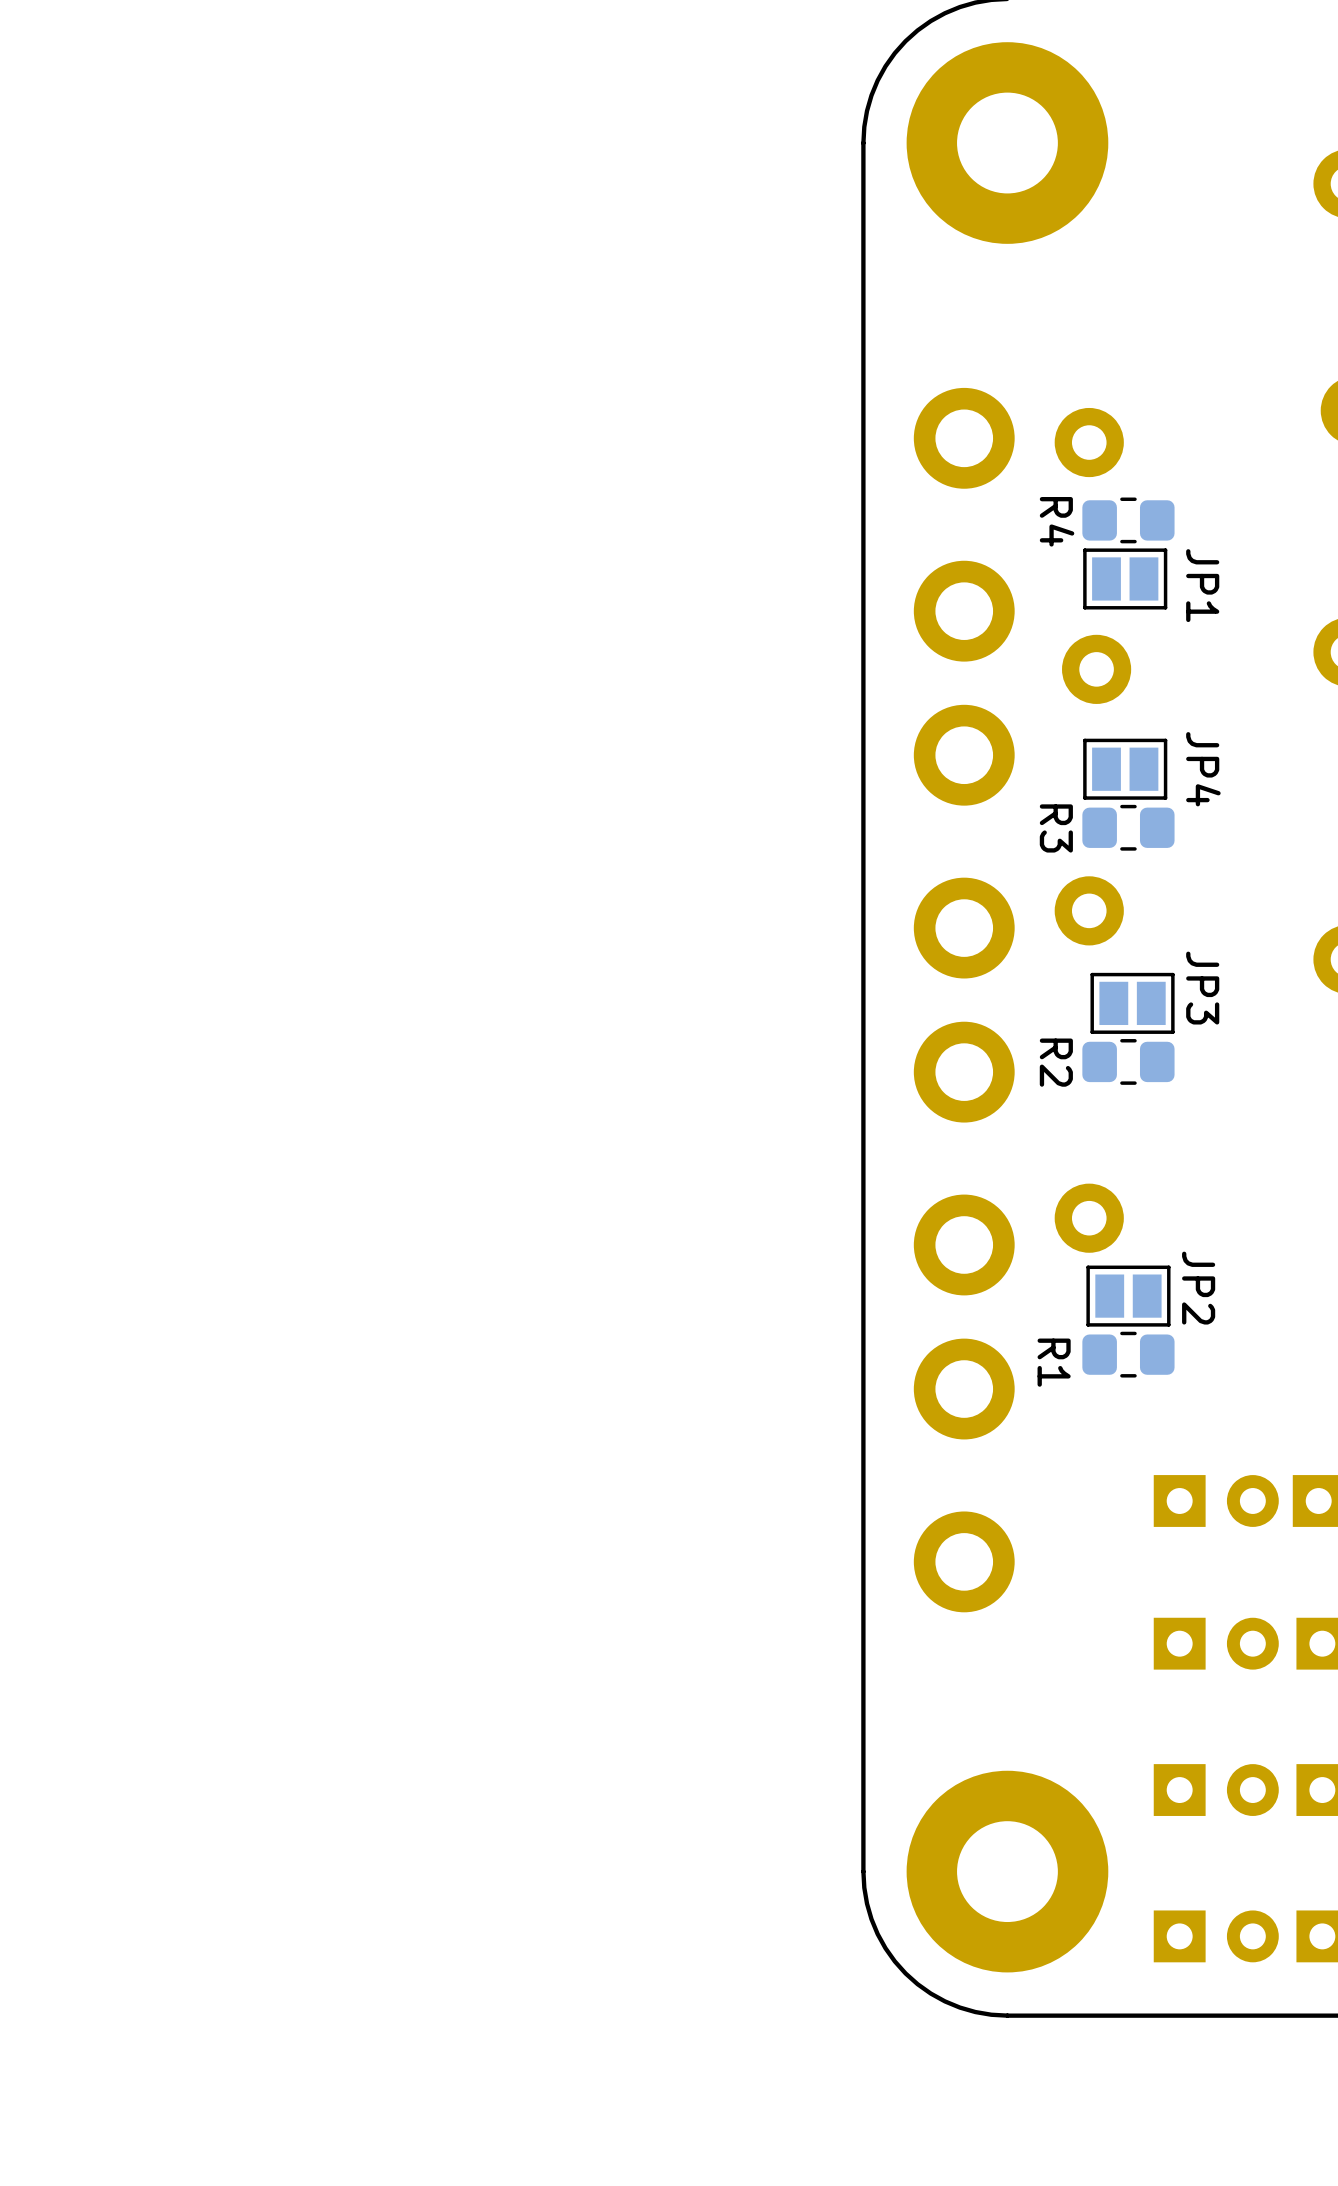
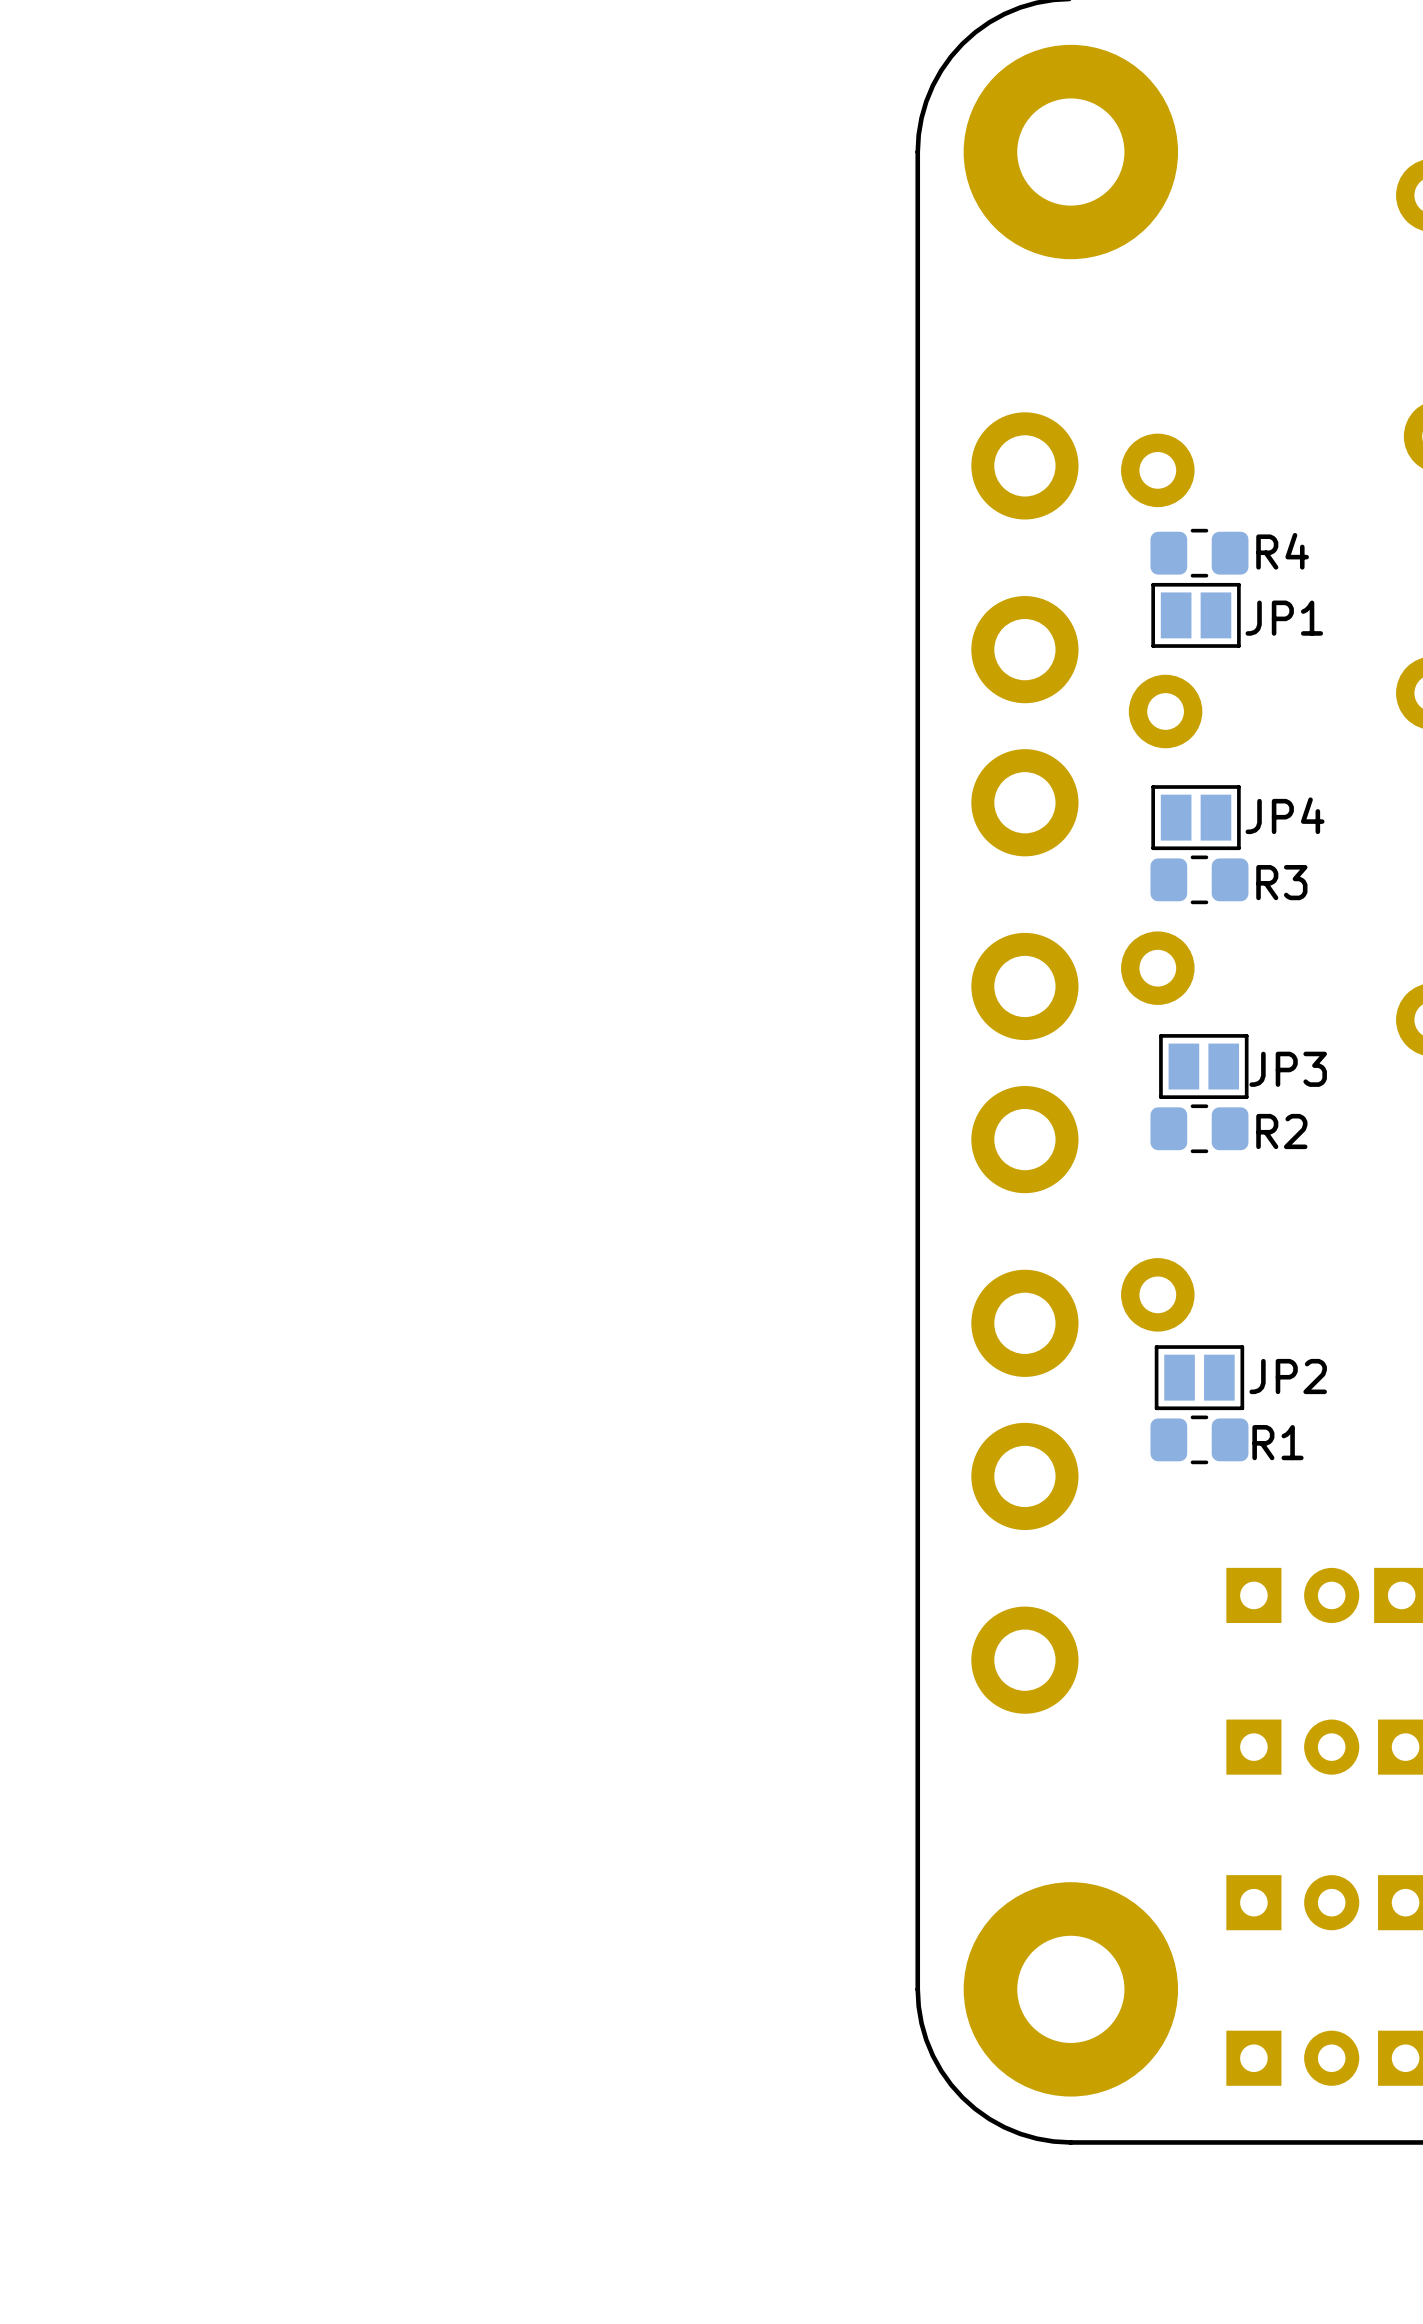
R4 name rotation: 0° (1057, 521) -> 90° counterclockwise (1282, 551)
R4 name position: R4 (1057, 521) -> R4 (1282, 551)
JP1 name rotation: 0° (1202, 585) -> 90° counterclockwise (1284, 618)
JP4 name rotation: 0° (1203, 769) -> 90° counterclockwise (1285, 815)
R3 name rotation: 0° (1056, 828) -> 90° counterclockwise (1281, 882)
R3 name position: R3 (1056, 828) -> R3 (1281, 882)
JP3 name rotation: 0° (1202, 988) -> 90° counterclockwise (1288, 1069)
R2 name rotation: 0° (1056, 1062) -> 90° counterclockwise (1281, 1131)
R2 name position: R2 (1056, 1062) -> R2 (1281, 1131)
JP2 name rotation: 0° (1198, 1288) -> 90° counterclockwise (1288, 1376)
R1 name rotation: 0° (1054, 1362) -> 90° counterclockwise (1277, 1442)
R1 name position: R1 (1054, 1362) -> R1 (1277, 1442)

